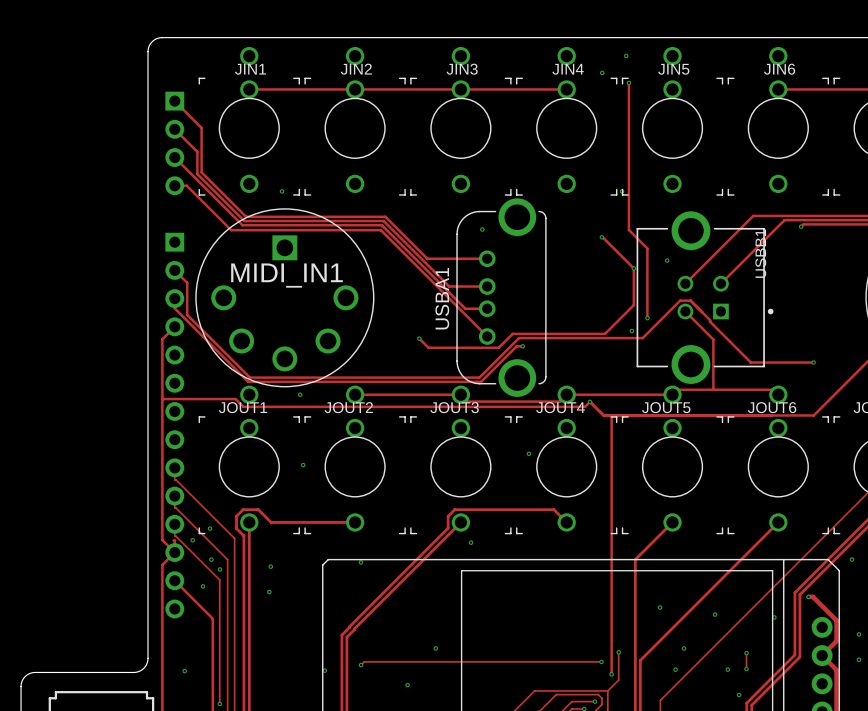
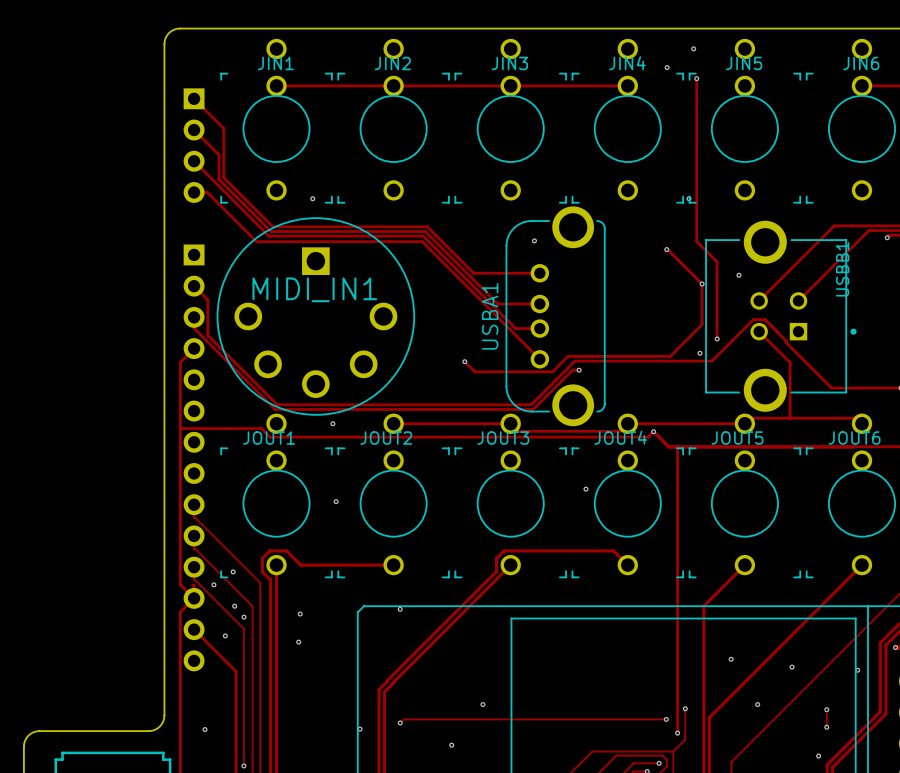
via: (471, 542) -> none
via: (675, 669) -> none
via: (727, 669) -> none

